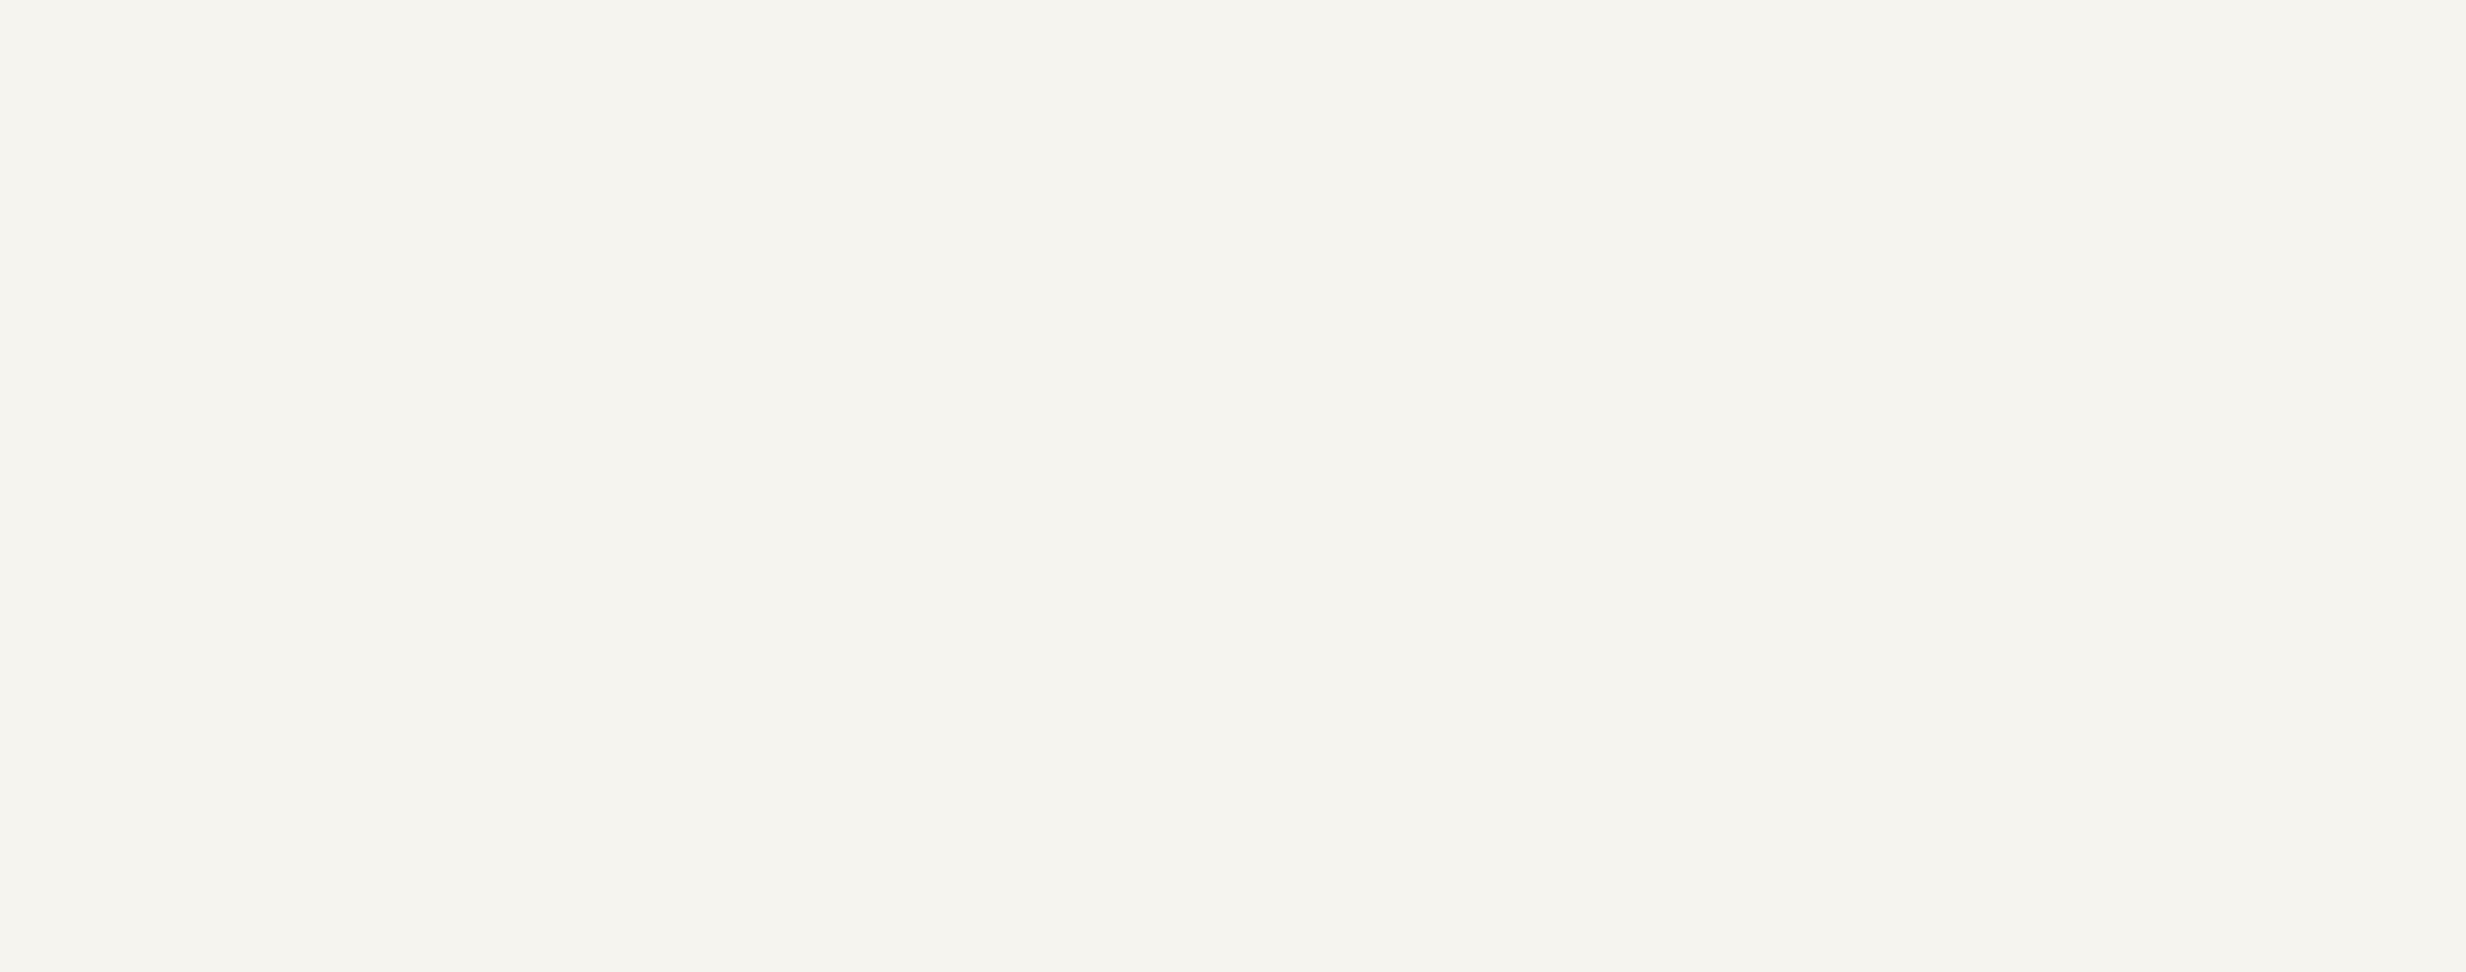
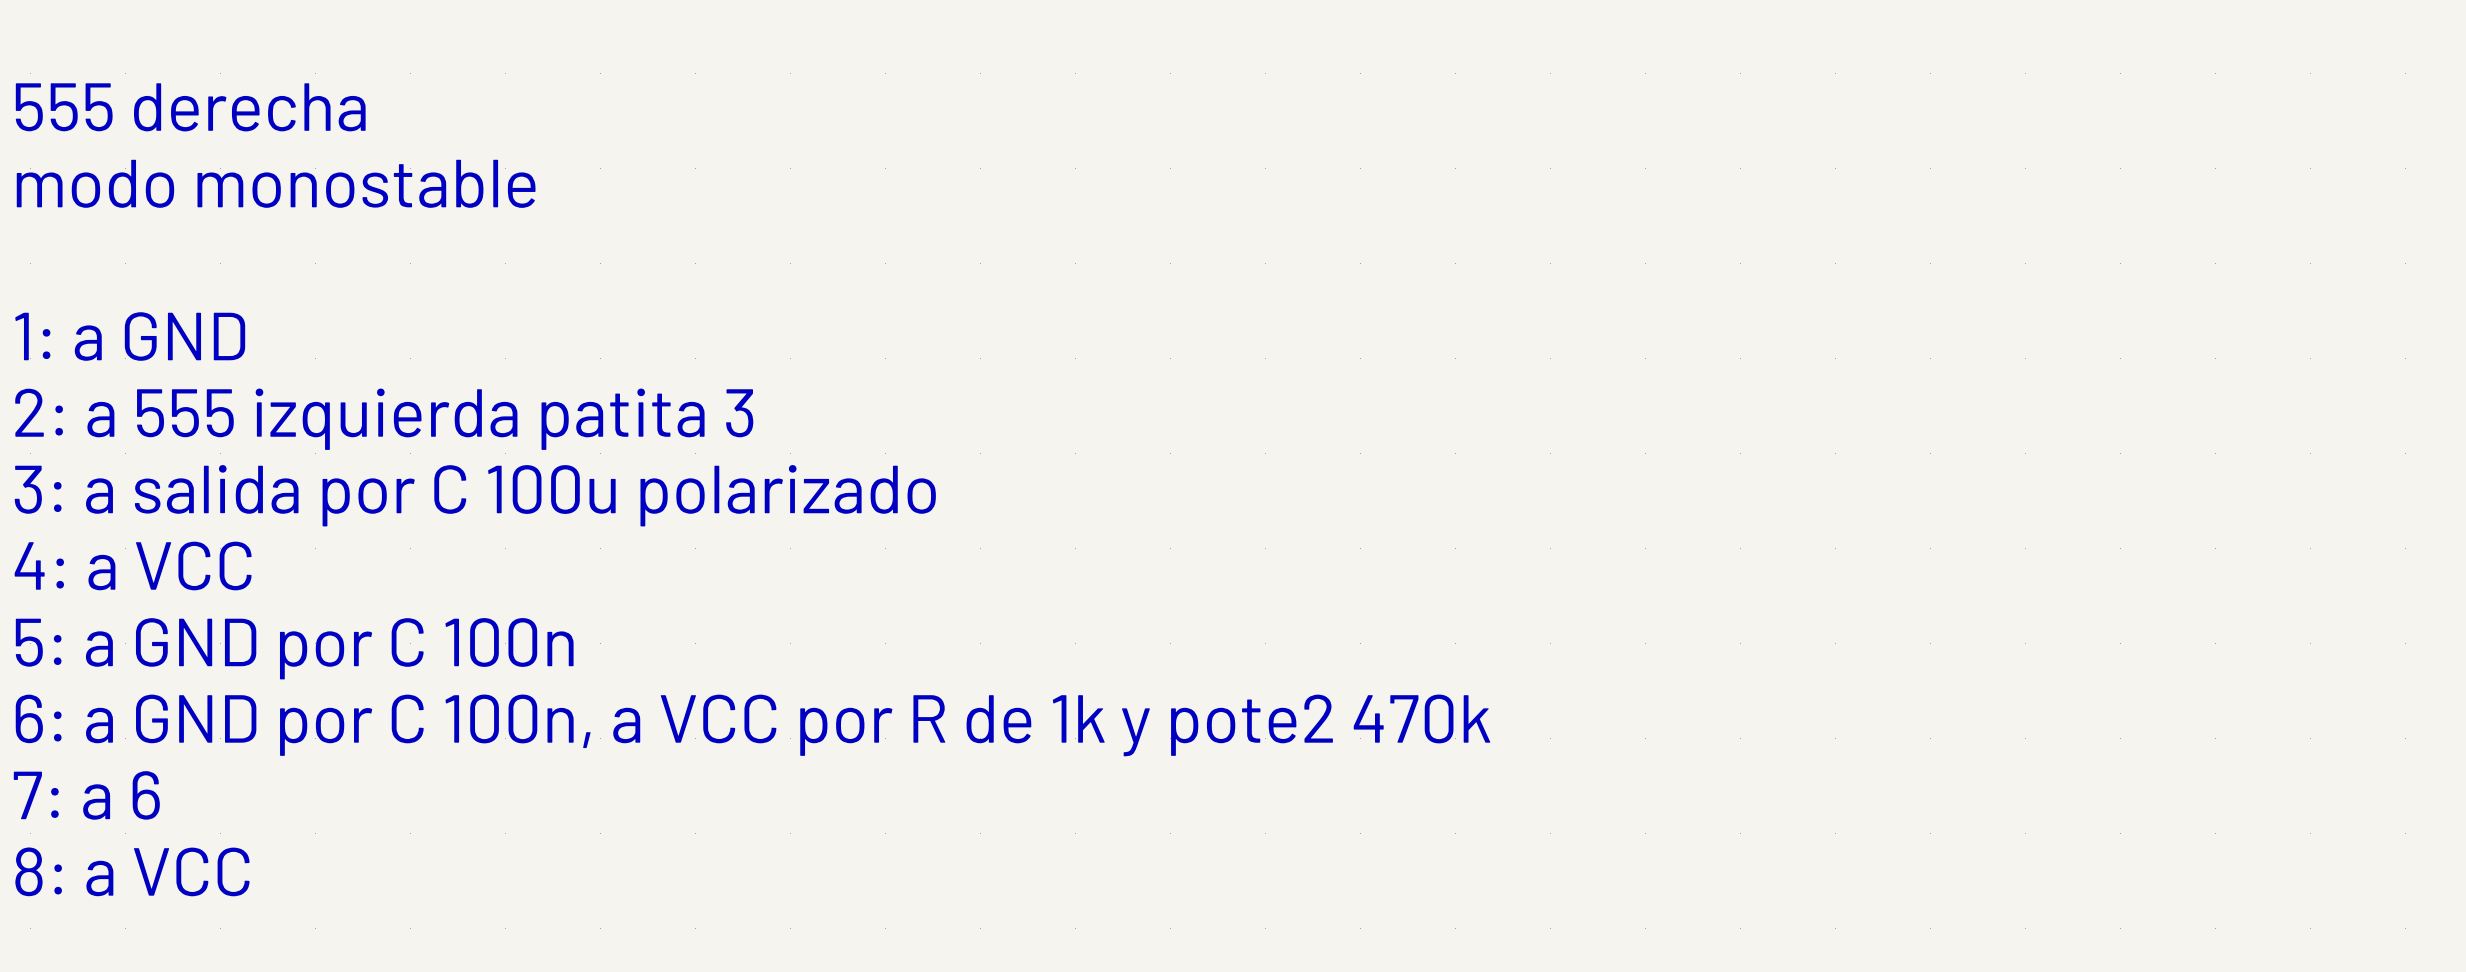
text: none -> 555 derecha (190, 107)
text: none -> modo monostable (276, 183)
text: none -> 1: a GND (130, 336)
text: none -> 2: a 555 izquierda patita 3 (384, 419)
text: none -> 3: a salida por C 100u polarizado (475, 495)
text: none -> 4: a VCC (133, 566)
text: none -> 5: a GND por C 100n (294, 648)
text: none -> 6: a GND por C 100n, a VCC por R de 1k y pote2 470k (753, 725)
text: none -> 7: a 6 (86, 795)
text: none -> 8: a VCC (132, 871)

